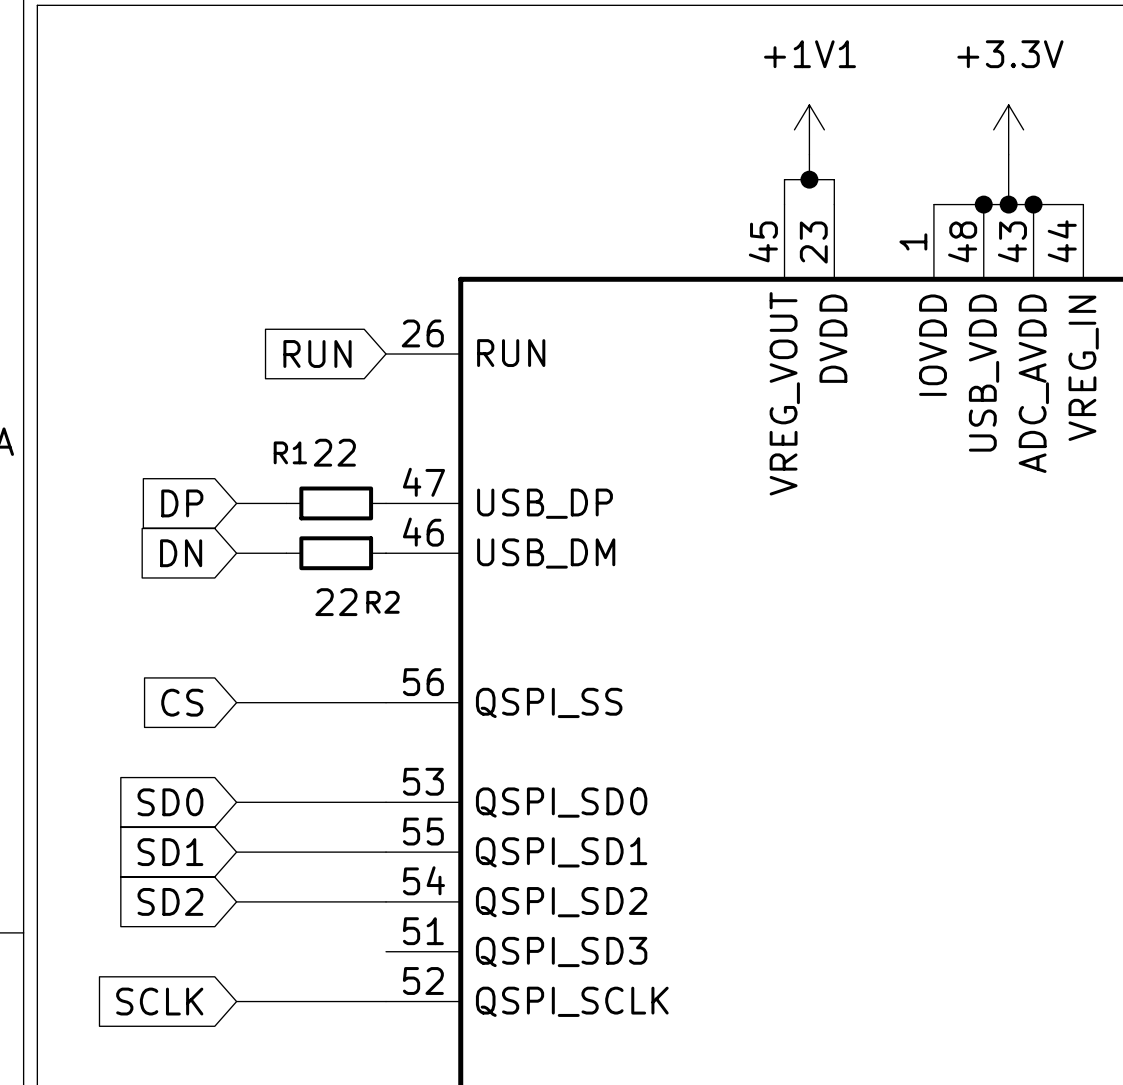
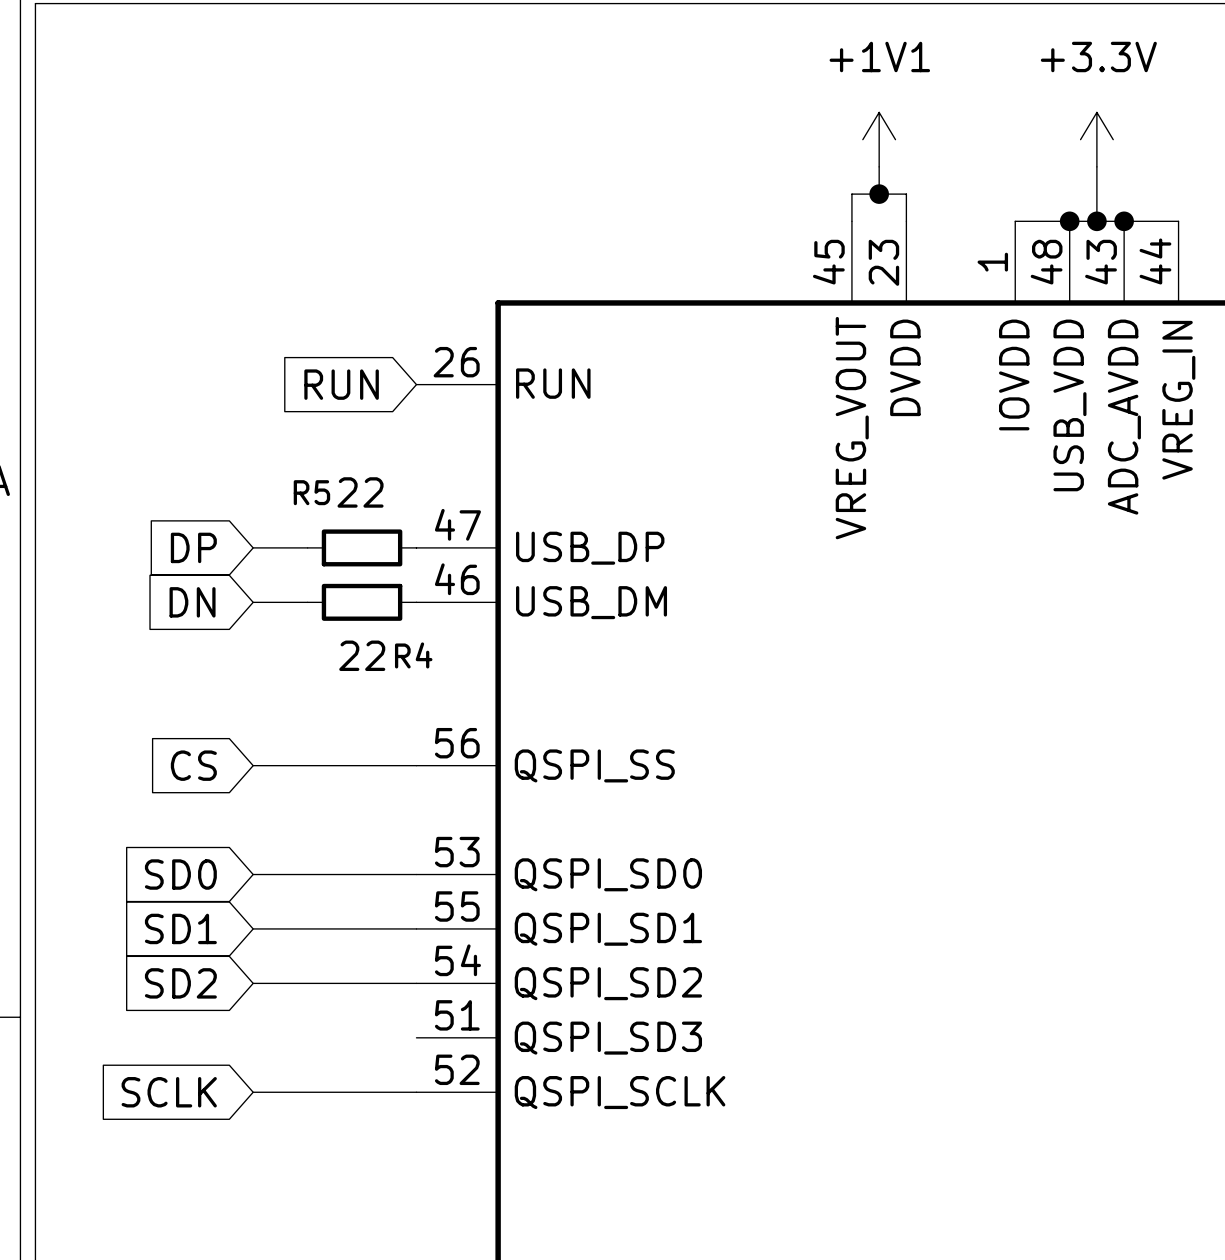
R1 name: R1 (290, 452) -> R5 (311, 492)
R2 name: R2 (383, 602) -> R4 (413, 655)

